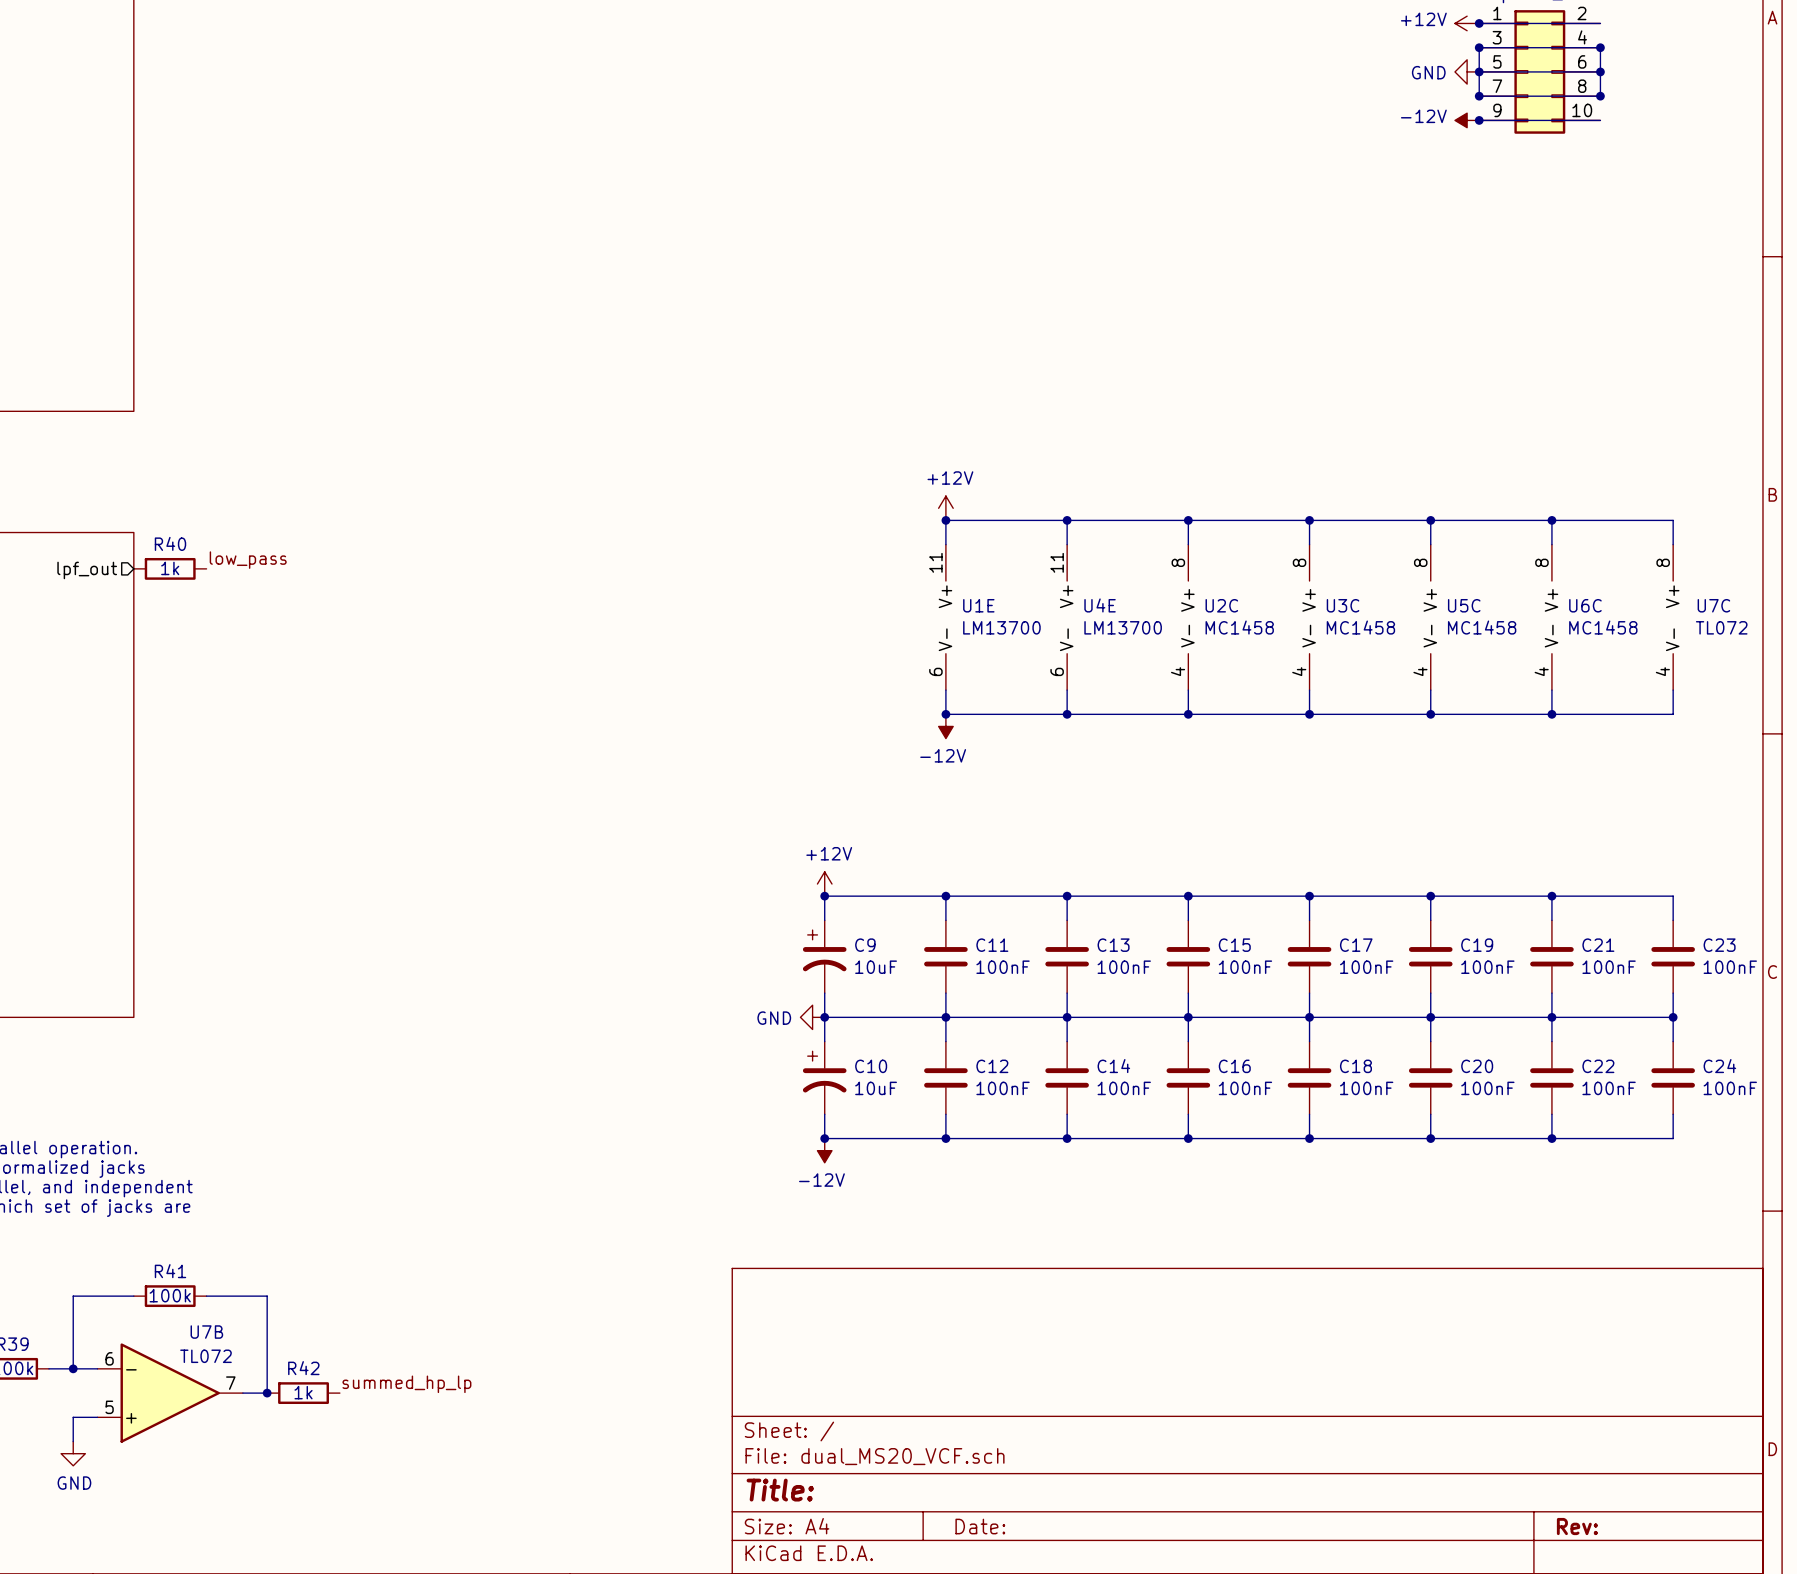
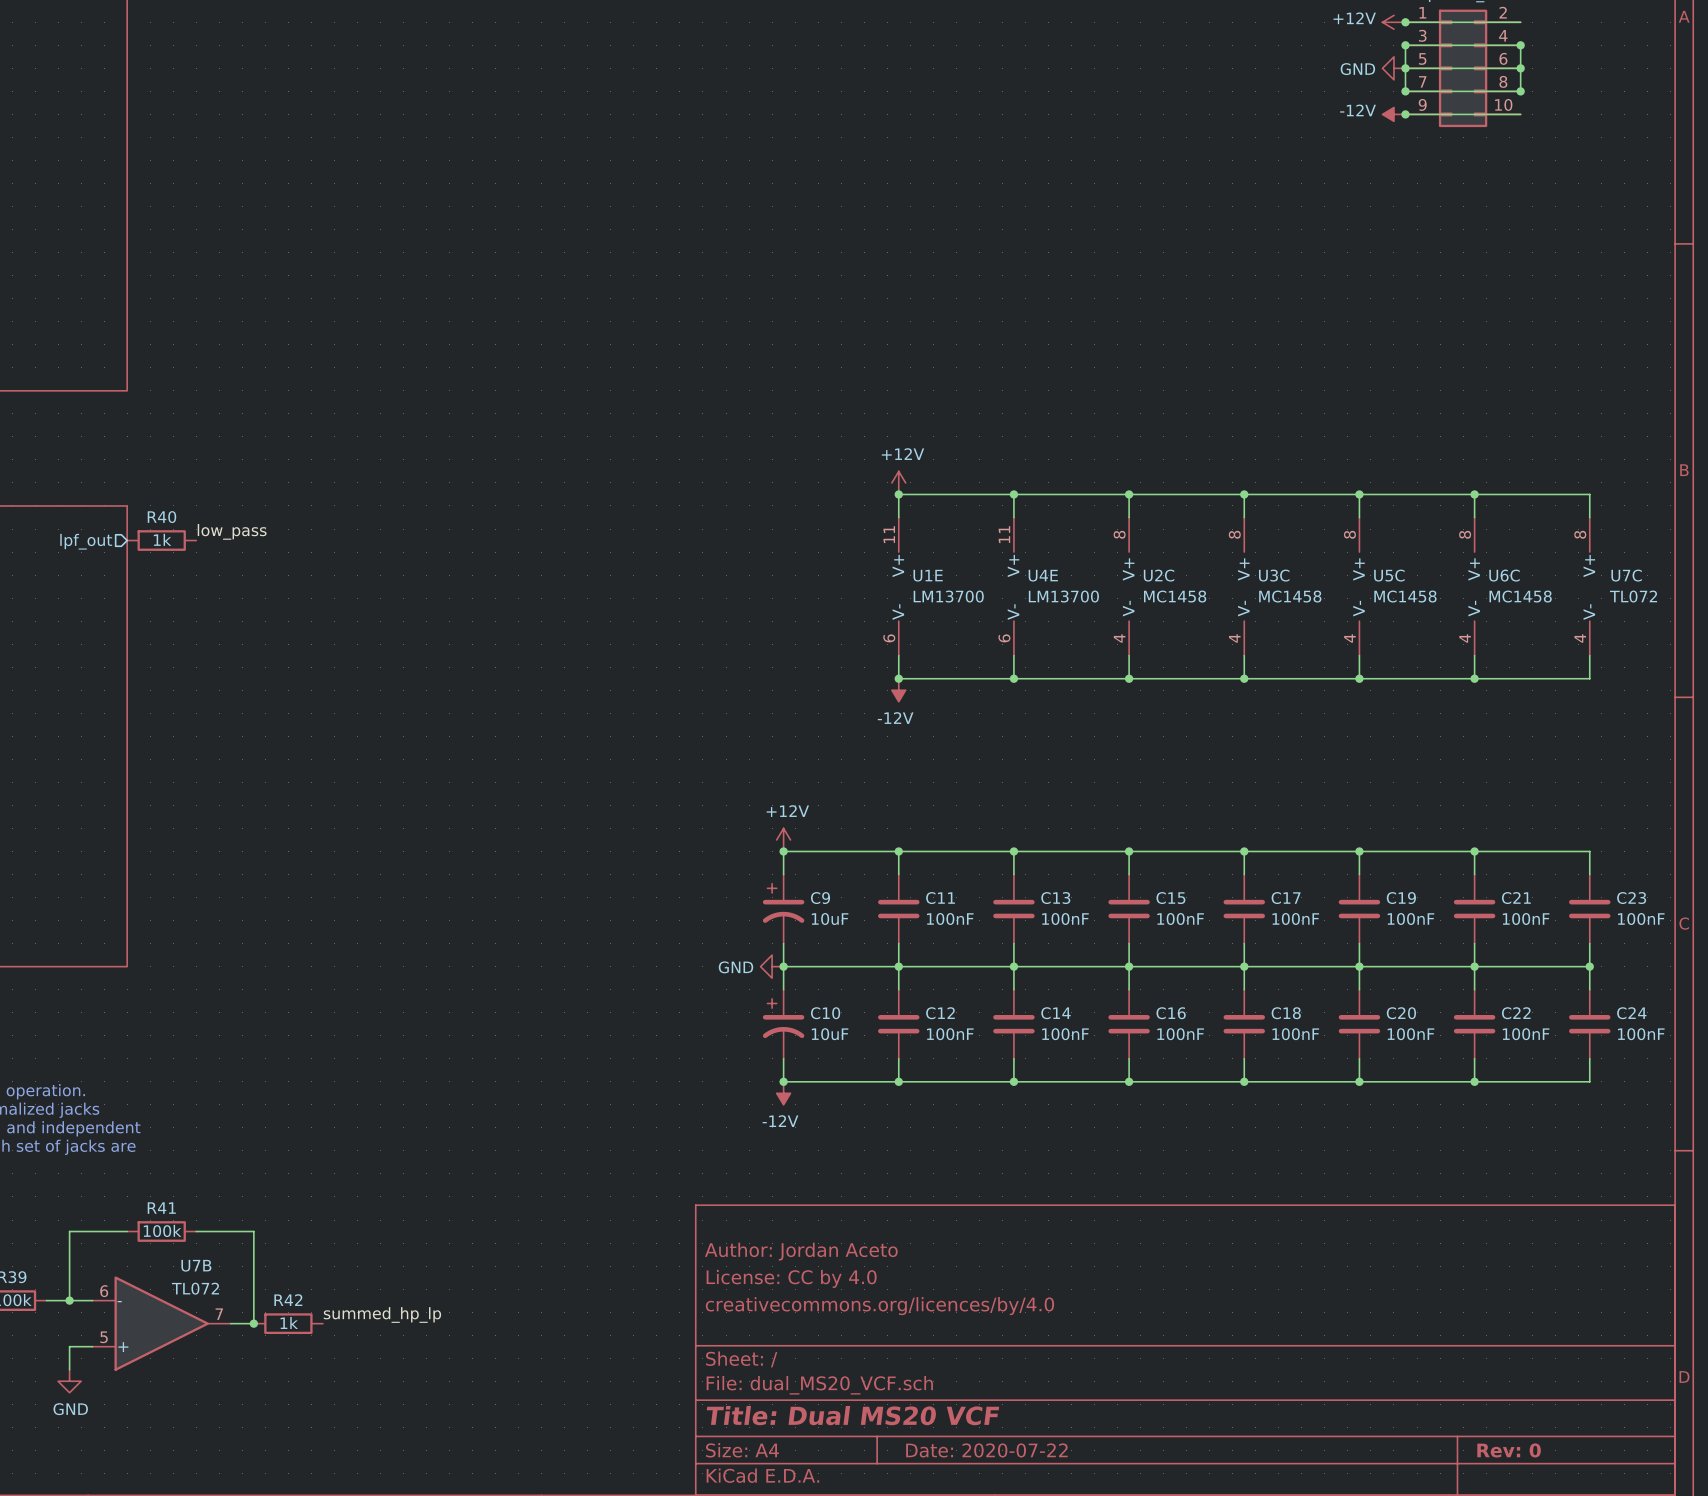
title block: none -> Author: Jordan Aceto (801, 1251)
title block: none -> License: CC by 4.0 (791, 1278)
title block: none -> creativecommons.org/licences/by/4.0 (879, 1306)
title block: Title: (780, 1490) -> Title: Dual MS20 VCF (852, 1415)
title block: Date: (980, 1526) -> Date: 2020-07-22 (986, 1450)
title block: Rev: (1577, 1526) -> Rev: 0 (1509, 1450)

